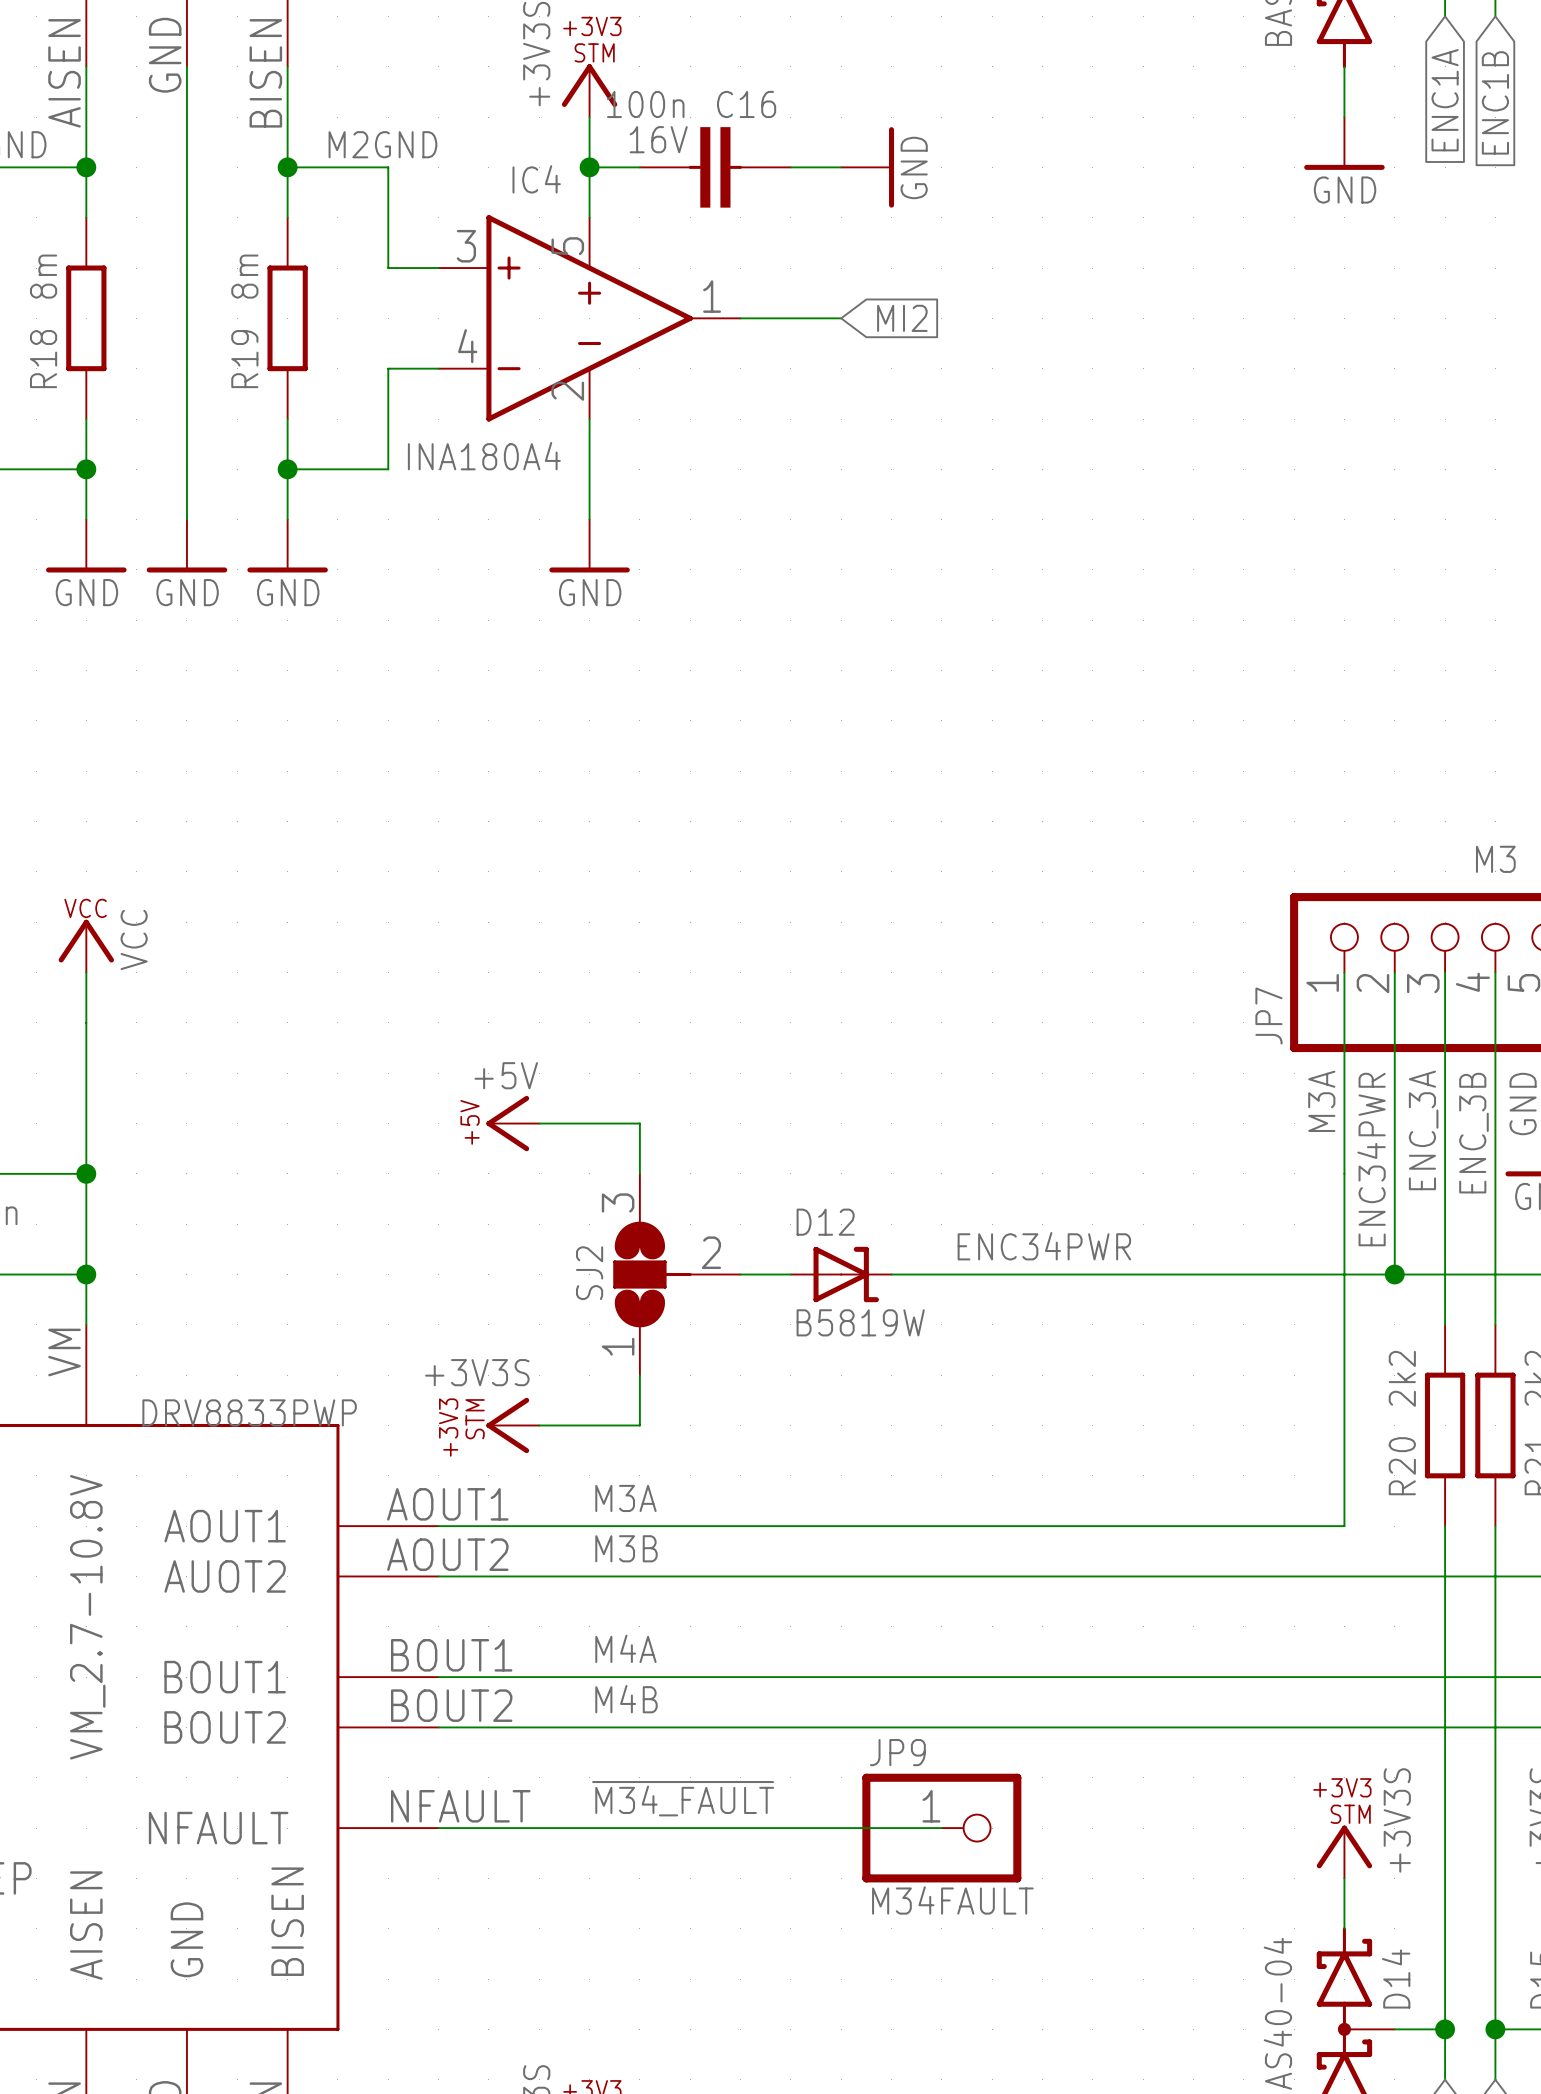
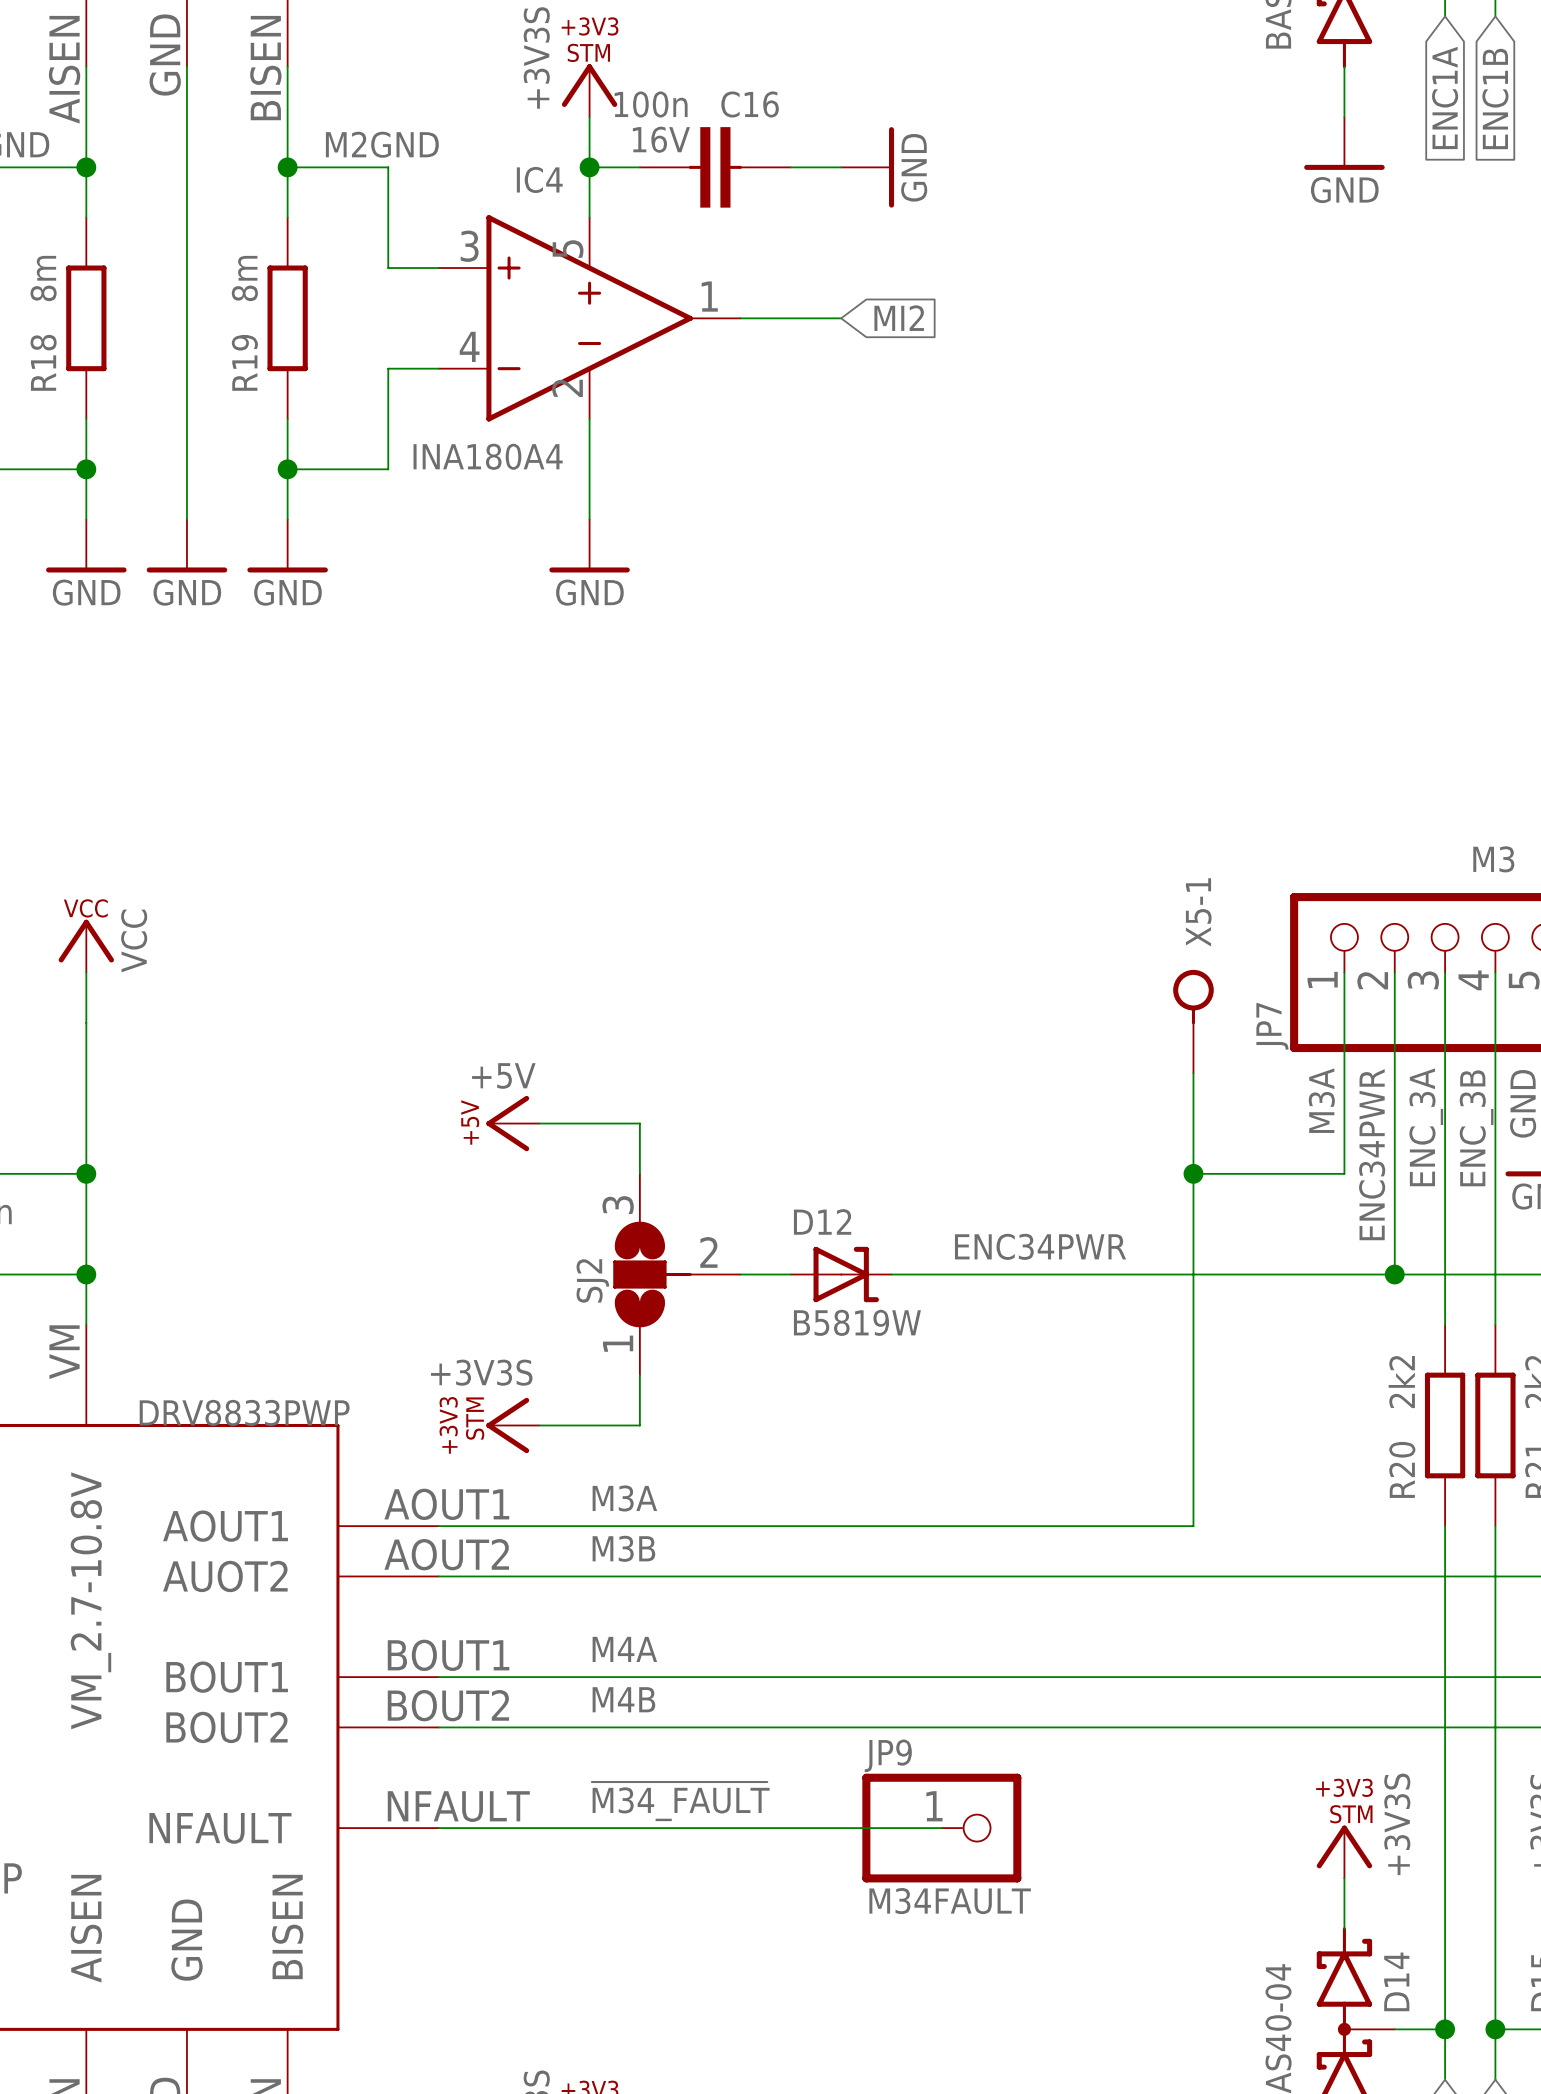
X5-1: none -> (1193, 1021)
wire: none -> (1193, 1173) (1344, 1173)
junction: none -> (1193, 1173)
wire: (1344, 1173) (1344, 1526) (1193, 1526) -> (1193, 1073) (1193, 1526)

